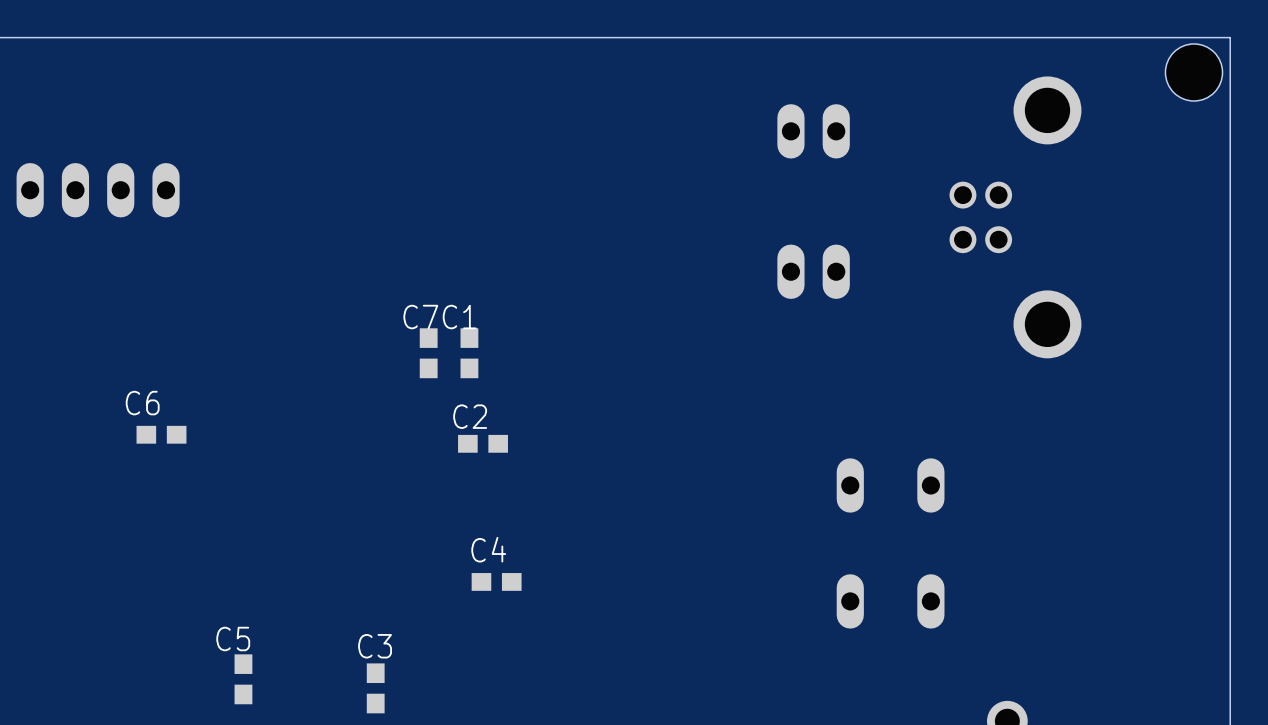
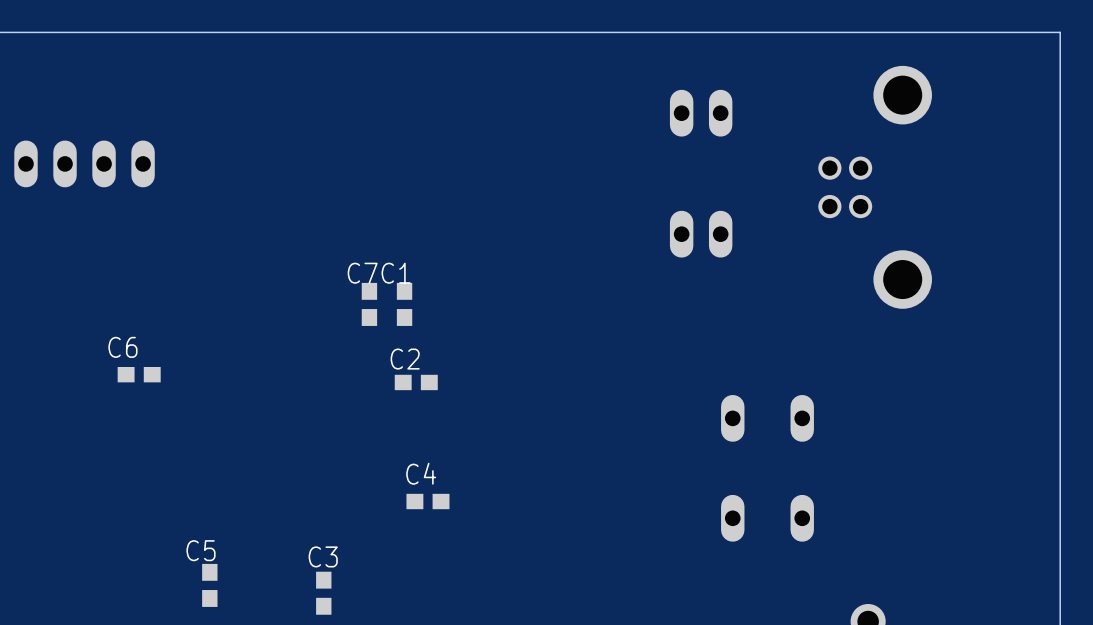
hole: (1194, 72) -> none

